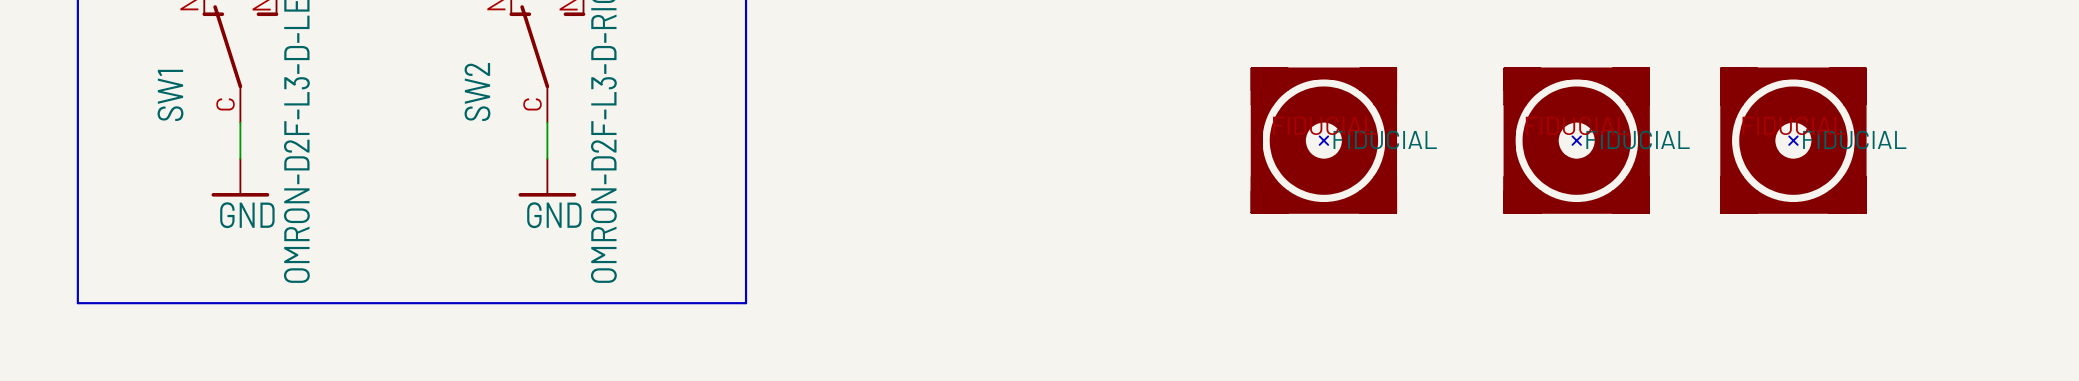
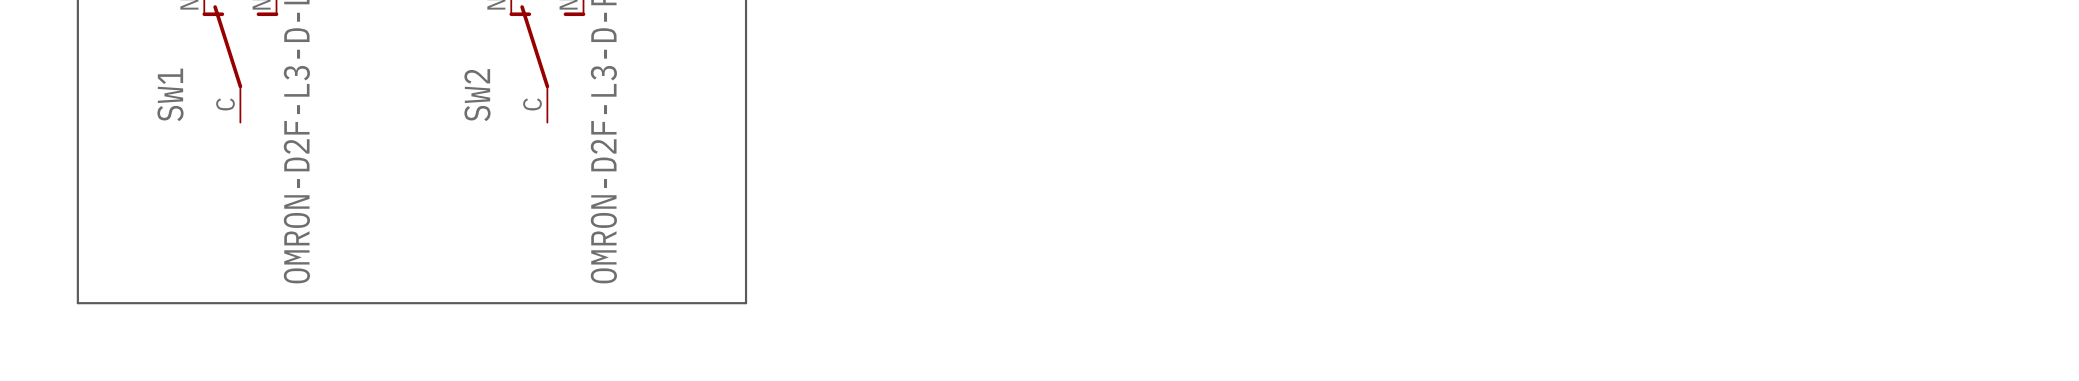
wire: (240, 122) (240, 158) -> none
wire: (547, 122) (547, 158) -> none
part: (1323, 140) -> none
part: (1576, 140) -> none
part: (1793, 140) -> none
power symbol: GND (240, 177) -> none
power symbol: GND (547, 177) -> none

